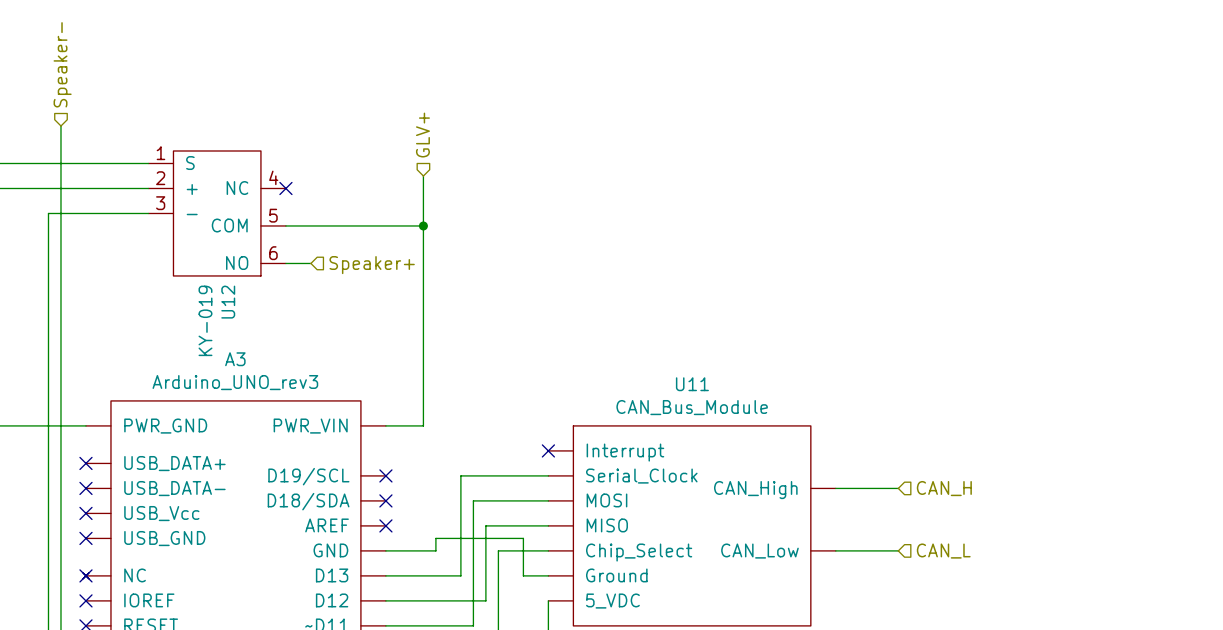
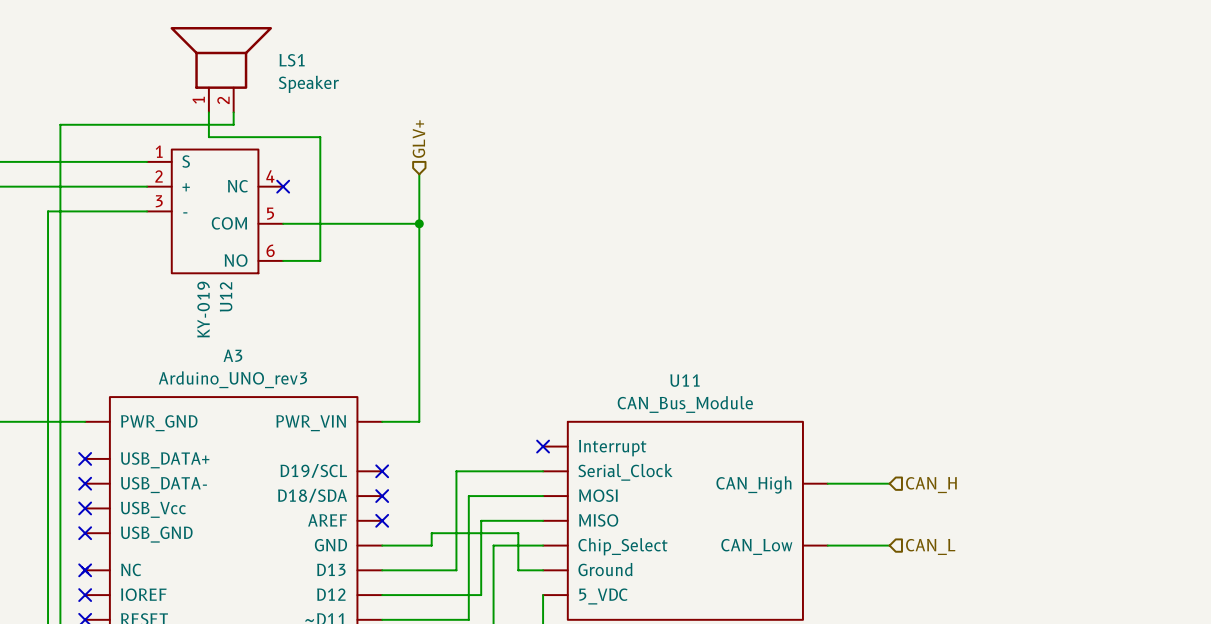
hierarchical label: Speaker- (62, 64) -> none
LS1: none -> Speaker (221, 69)
wire: none -> (208, 112) (208, 137) (320, 137) (320, 260) (307, 260)
wire: none -> (233, 112) (233, 124) (60, 124)
hierarchical label: Speaker+ (372, 265) -> none

